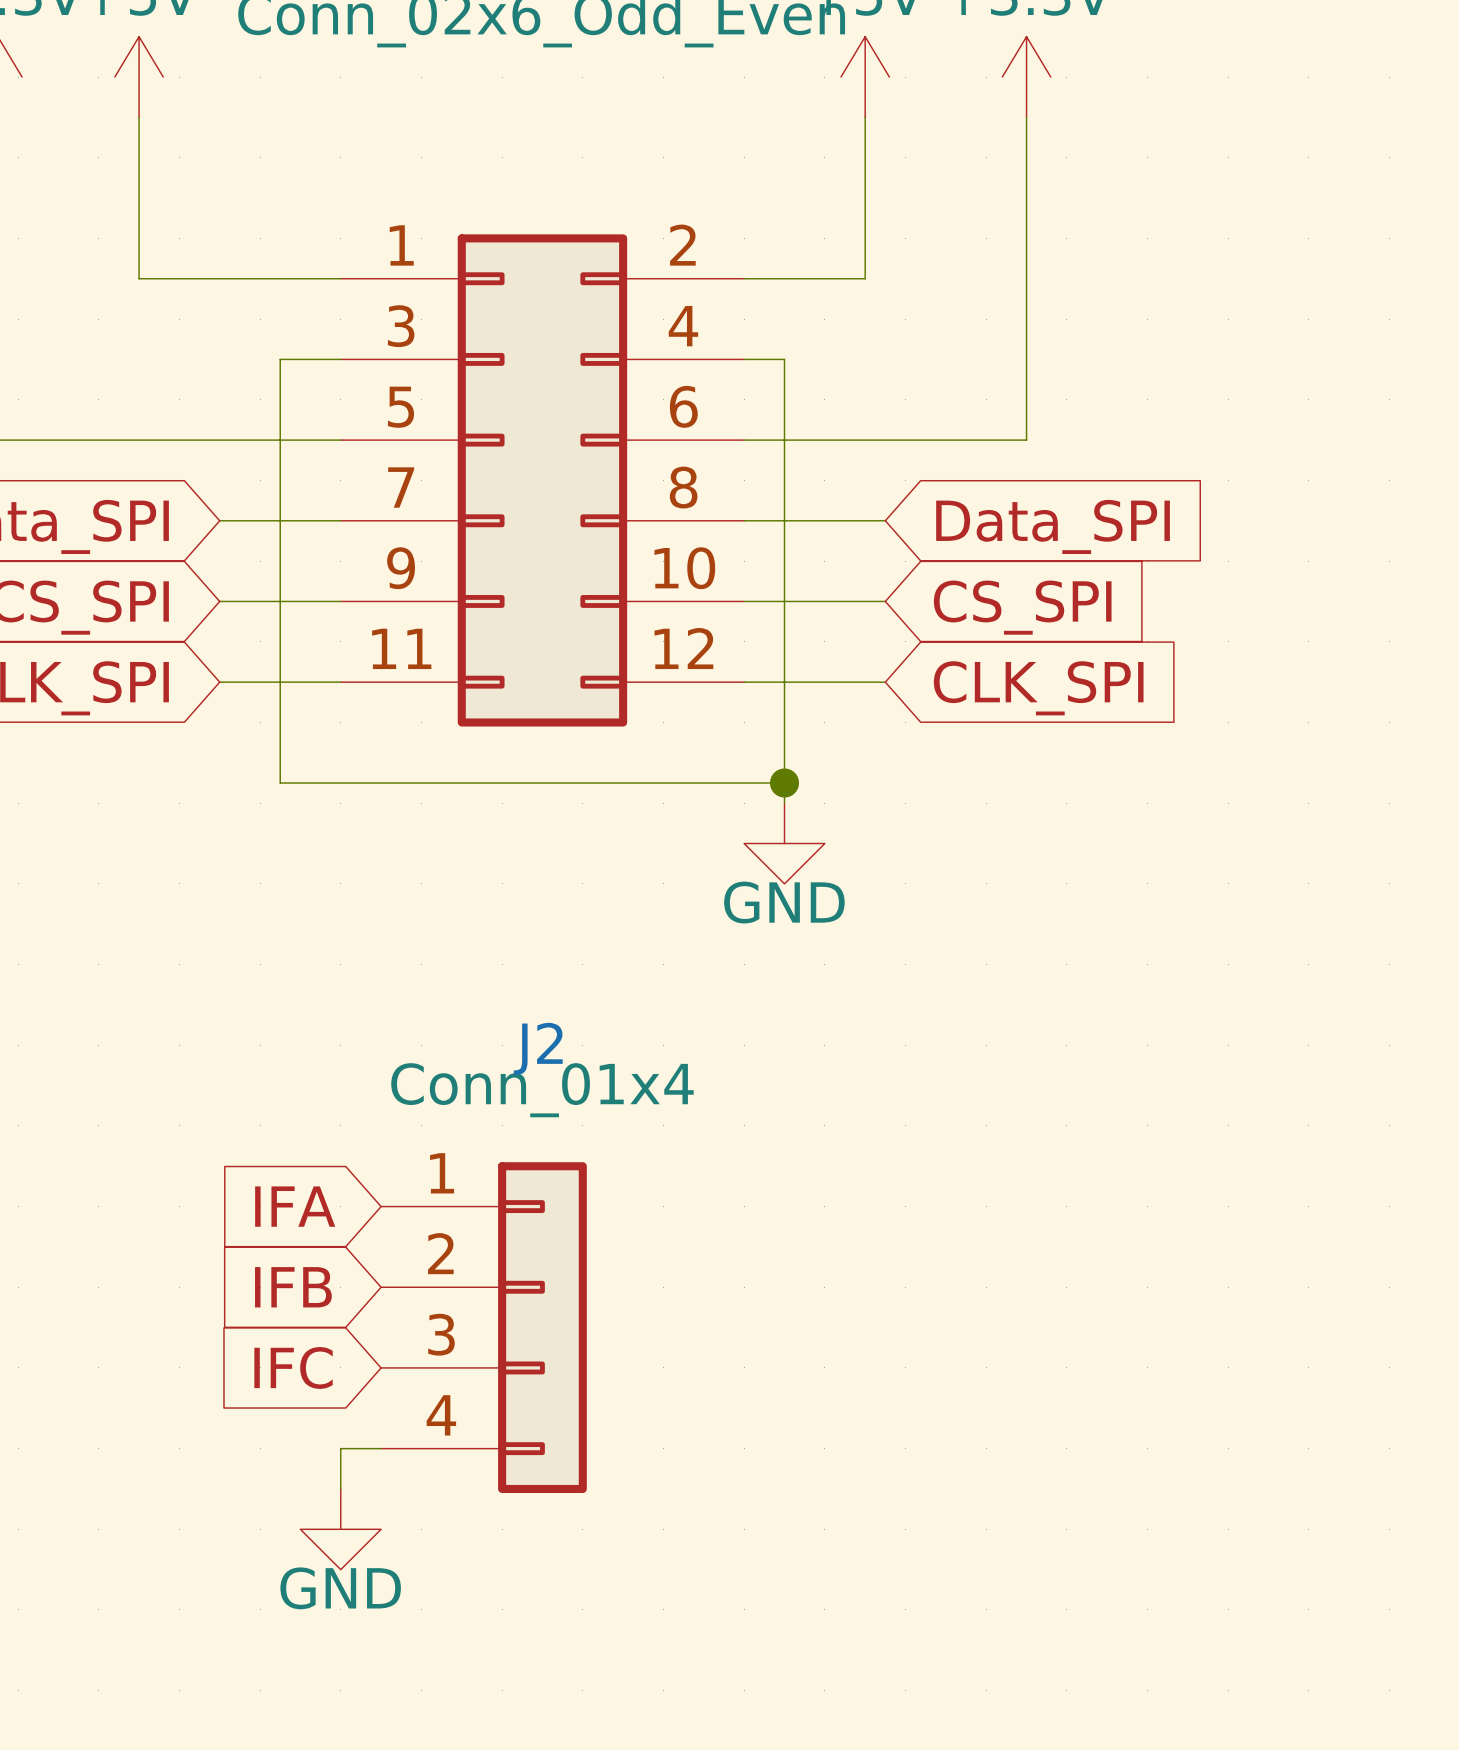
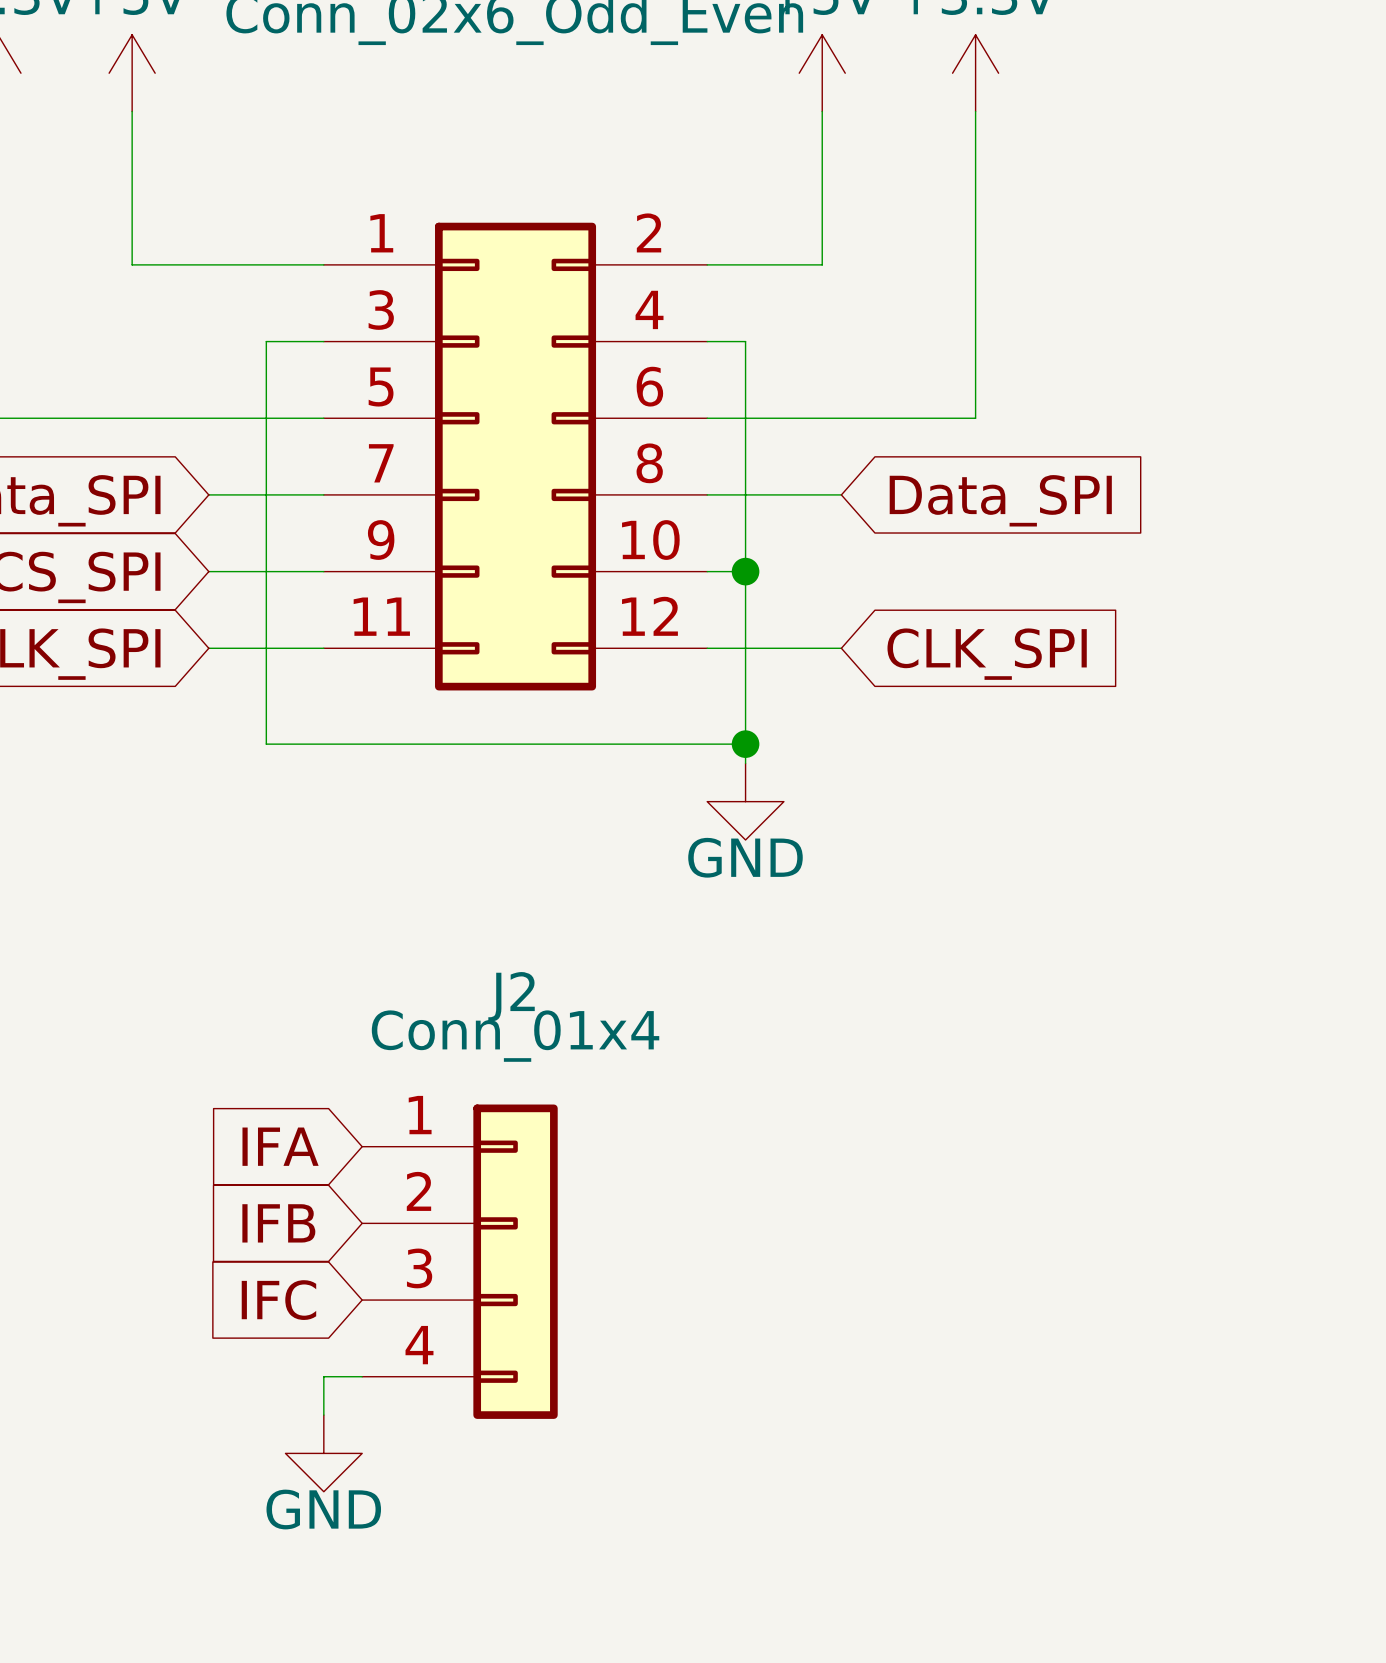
wire: (784, 601) (885, 601) -> none
junction: none -> (745, 571)
global label: CS_SPI (1022, 607) -> none

